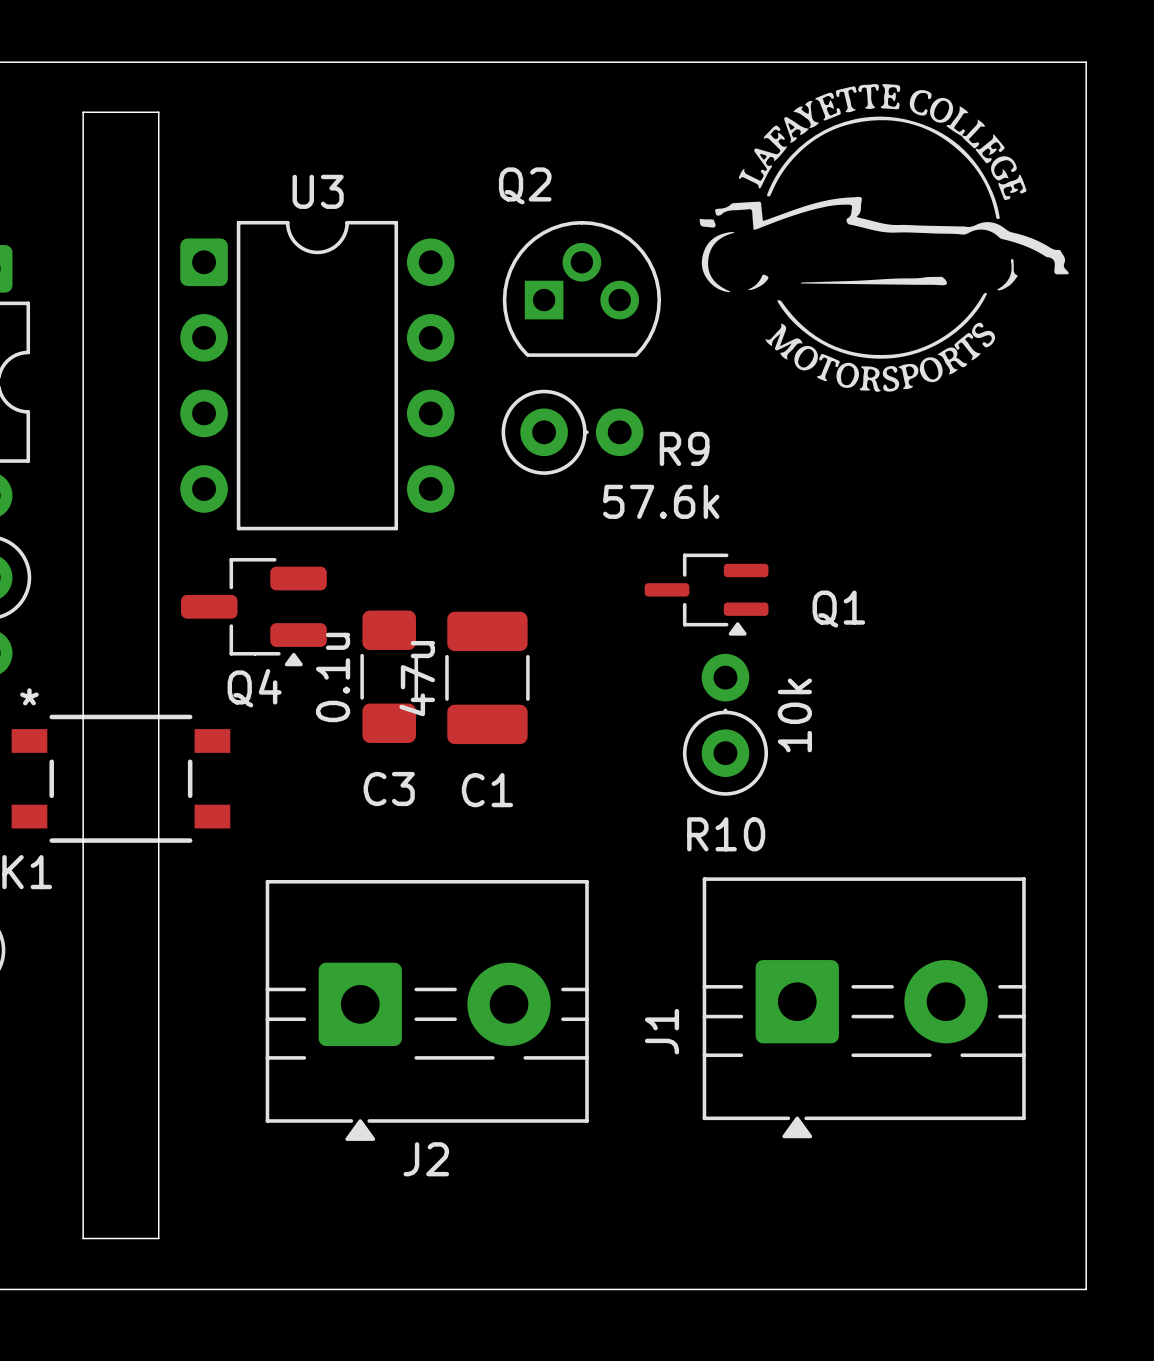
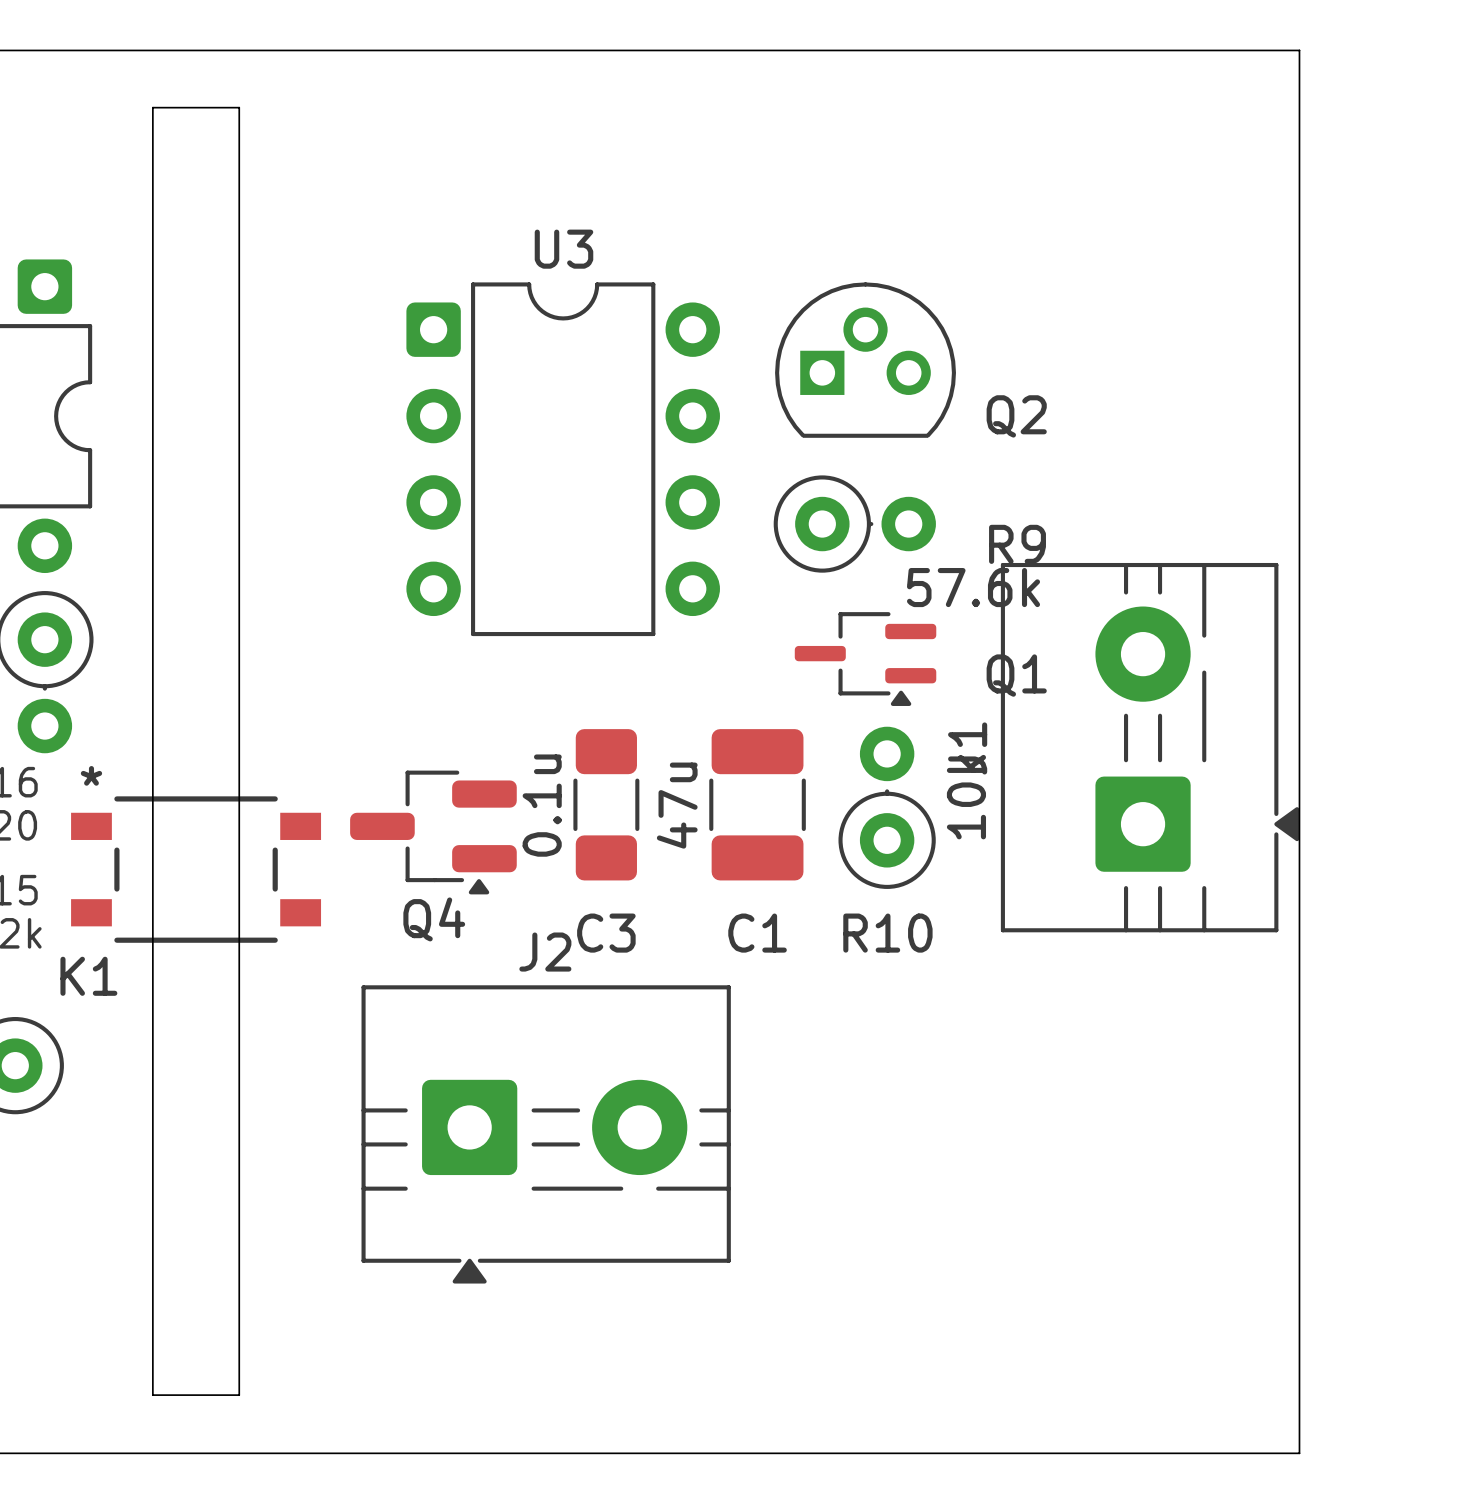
drawing: [699, 84, 1069, 392] -> none
Q2 name position: Q2 (525, 185) -> Q2 (1016, 416)
Q2 position: (581, 288) -> (865, 360)
U3 position: (317, 375) -> (563, 459)
R9 position: (572, 432) -> (854, 524)
R9 name position: R9 (684, 448) -> R9 (1017, 544)
R9 value position: 57.6k (661, 501) -> 57.6k (973, 587)
Q4 position: (253, 612) -> (433, 832)
C3 position: (389, 676) -> (606, 804)
C1 position: (487, 677) -> (757, 804)
J1 rotation: 0° (864, 1007) -> 90° counterclockwise (1150, 747)
J1 position: (864, 1007) -> (1150, 747)
J2 name position: J2 (426, 1159) -> J2 (545, 952)

